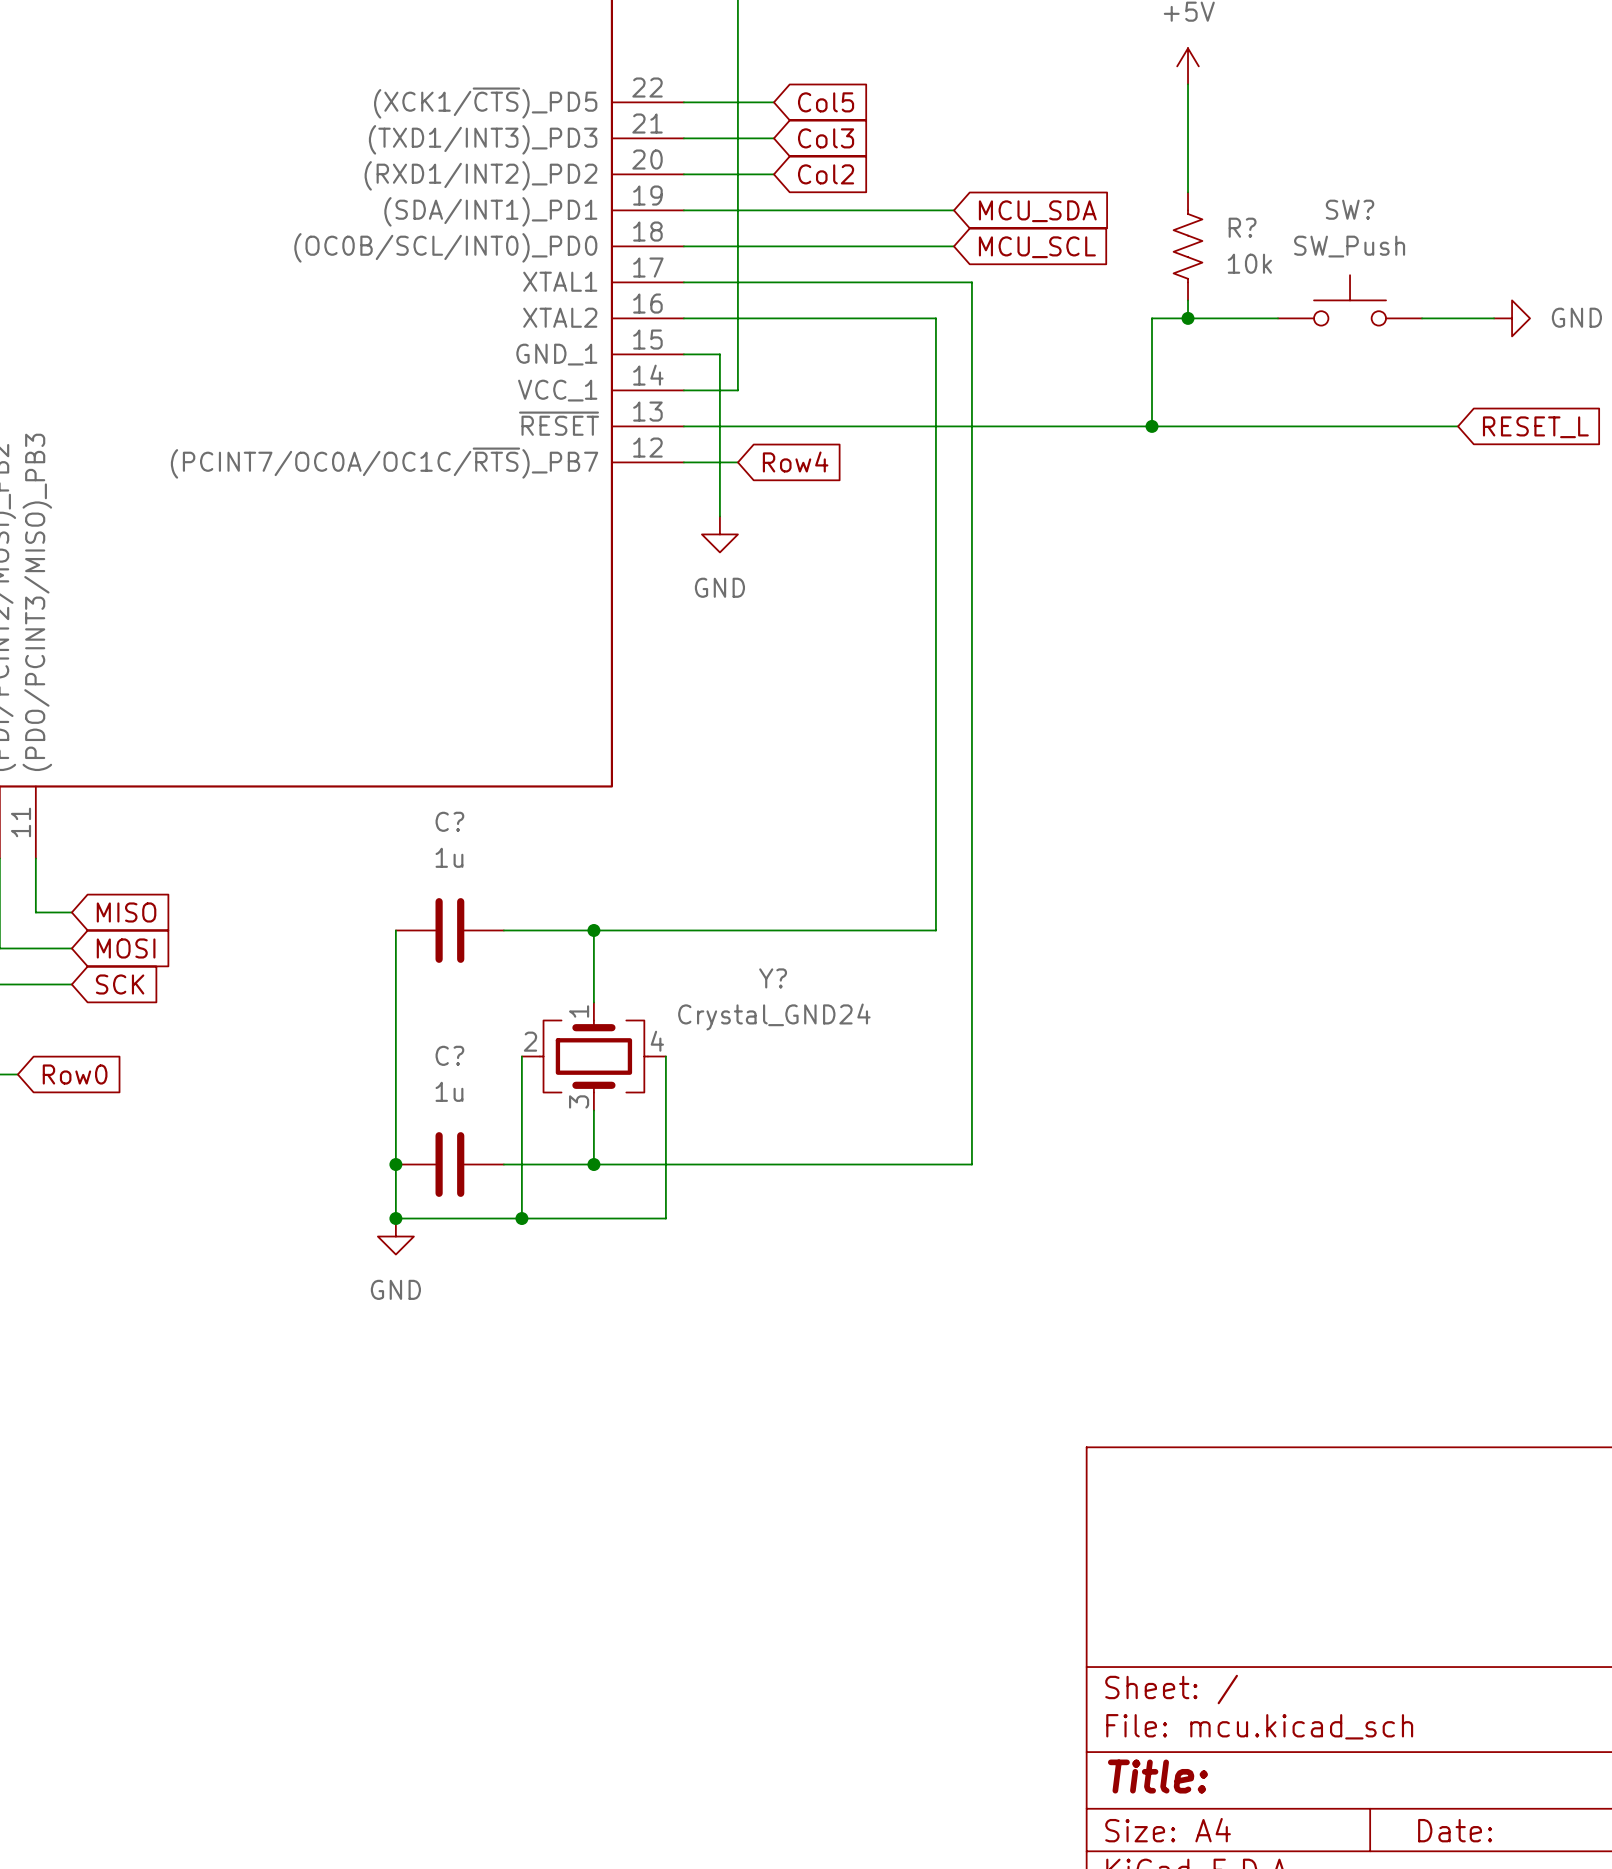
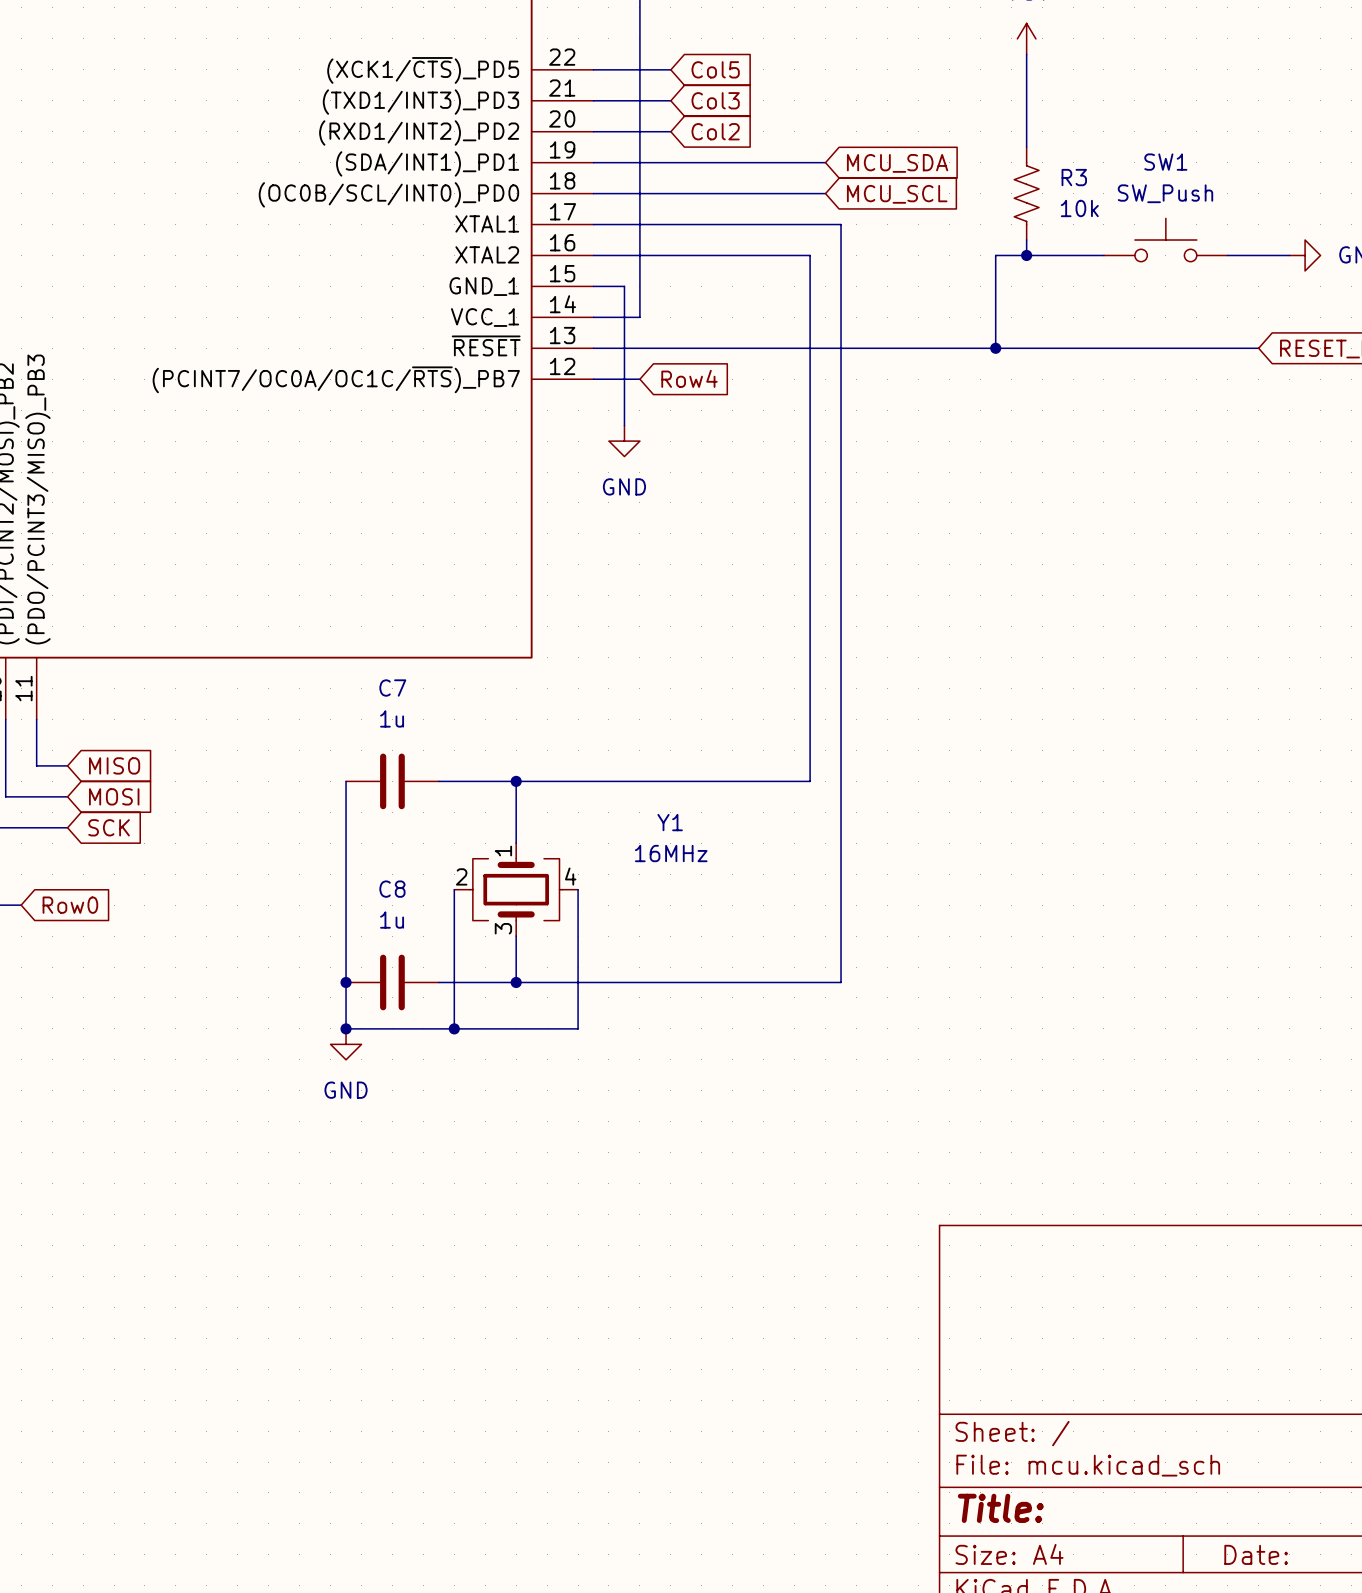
SW? name: SW? (1350, 209) -> SW1 (1165, 162)
R? name: R? (1242, 227) -> R3 (1074, 177)
C? name: C? (449, 821) -> C7 (392, 688)
Y? name: Y? (773, 978) -> Y1 (670, 822)
Y? value: Crystal_GND24 (774, 1016) -> 16MHz (671, 853)
C? name: C? (449, 1055) -> C8 (392, 889)

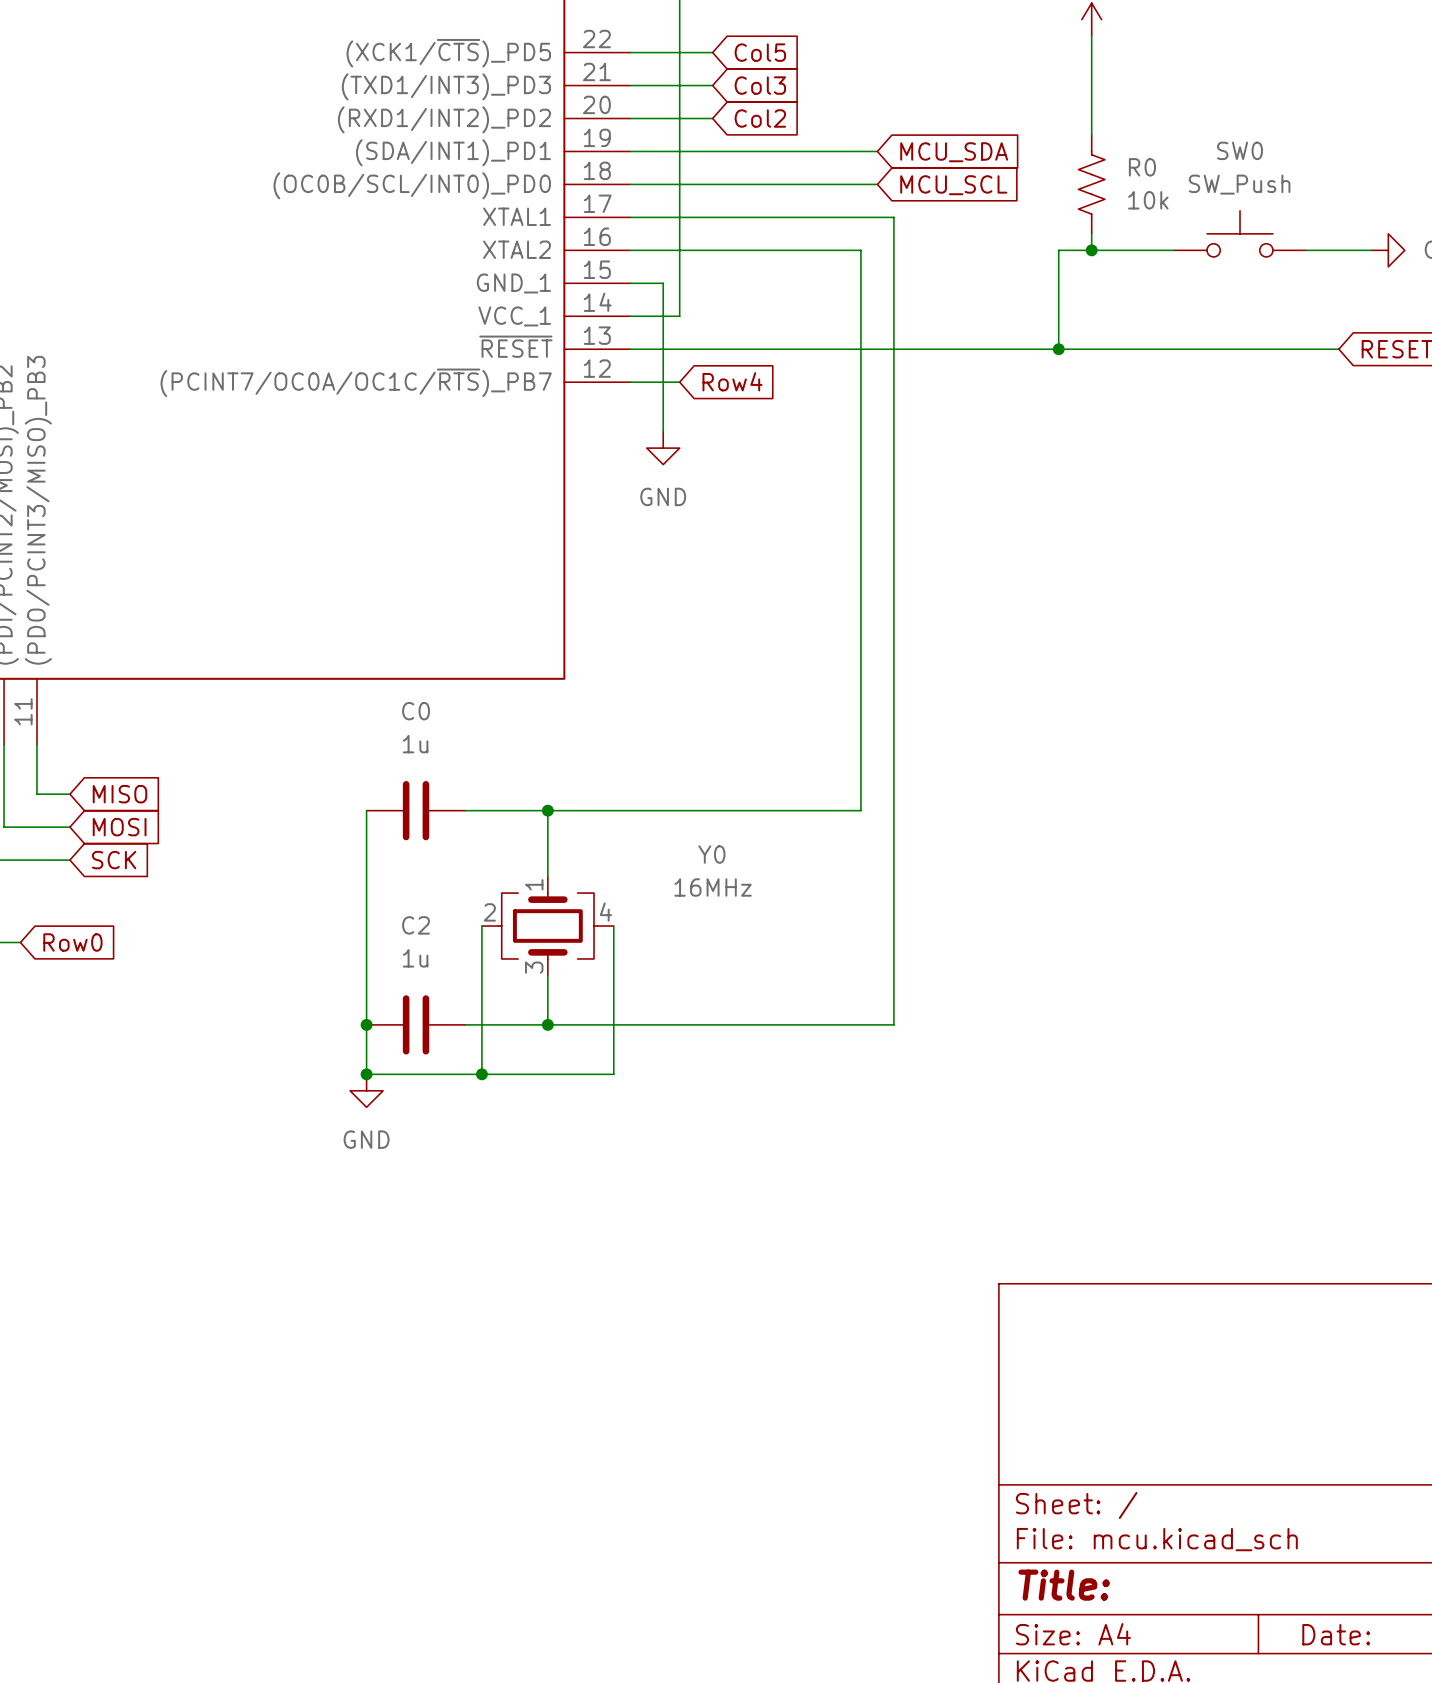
SW1 name: SW1 (1165, 162) -> SW0 (1240, 150)
R3 name: R3 (1074, 177) -> R0 (1142, 167)
C7 name: C7 (392, 688) -> C0 (416, 711)
Y1 name: Y1 (670, 822) -> Y0 (711, 854)
C8 name: C8 (392, 889) -> C2 (416, 925)

